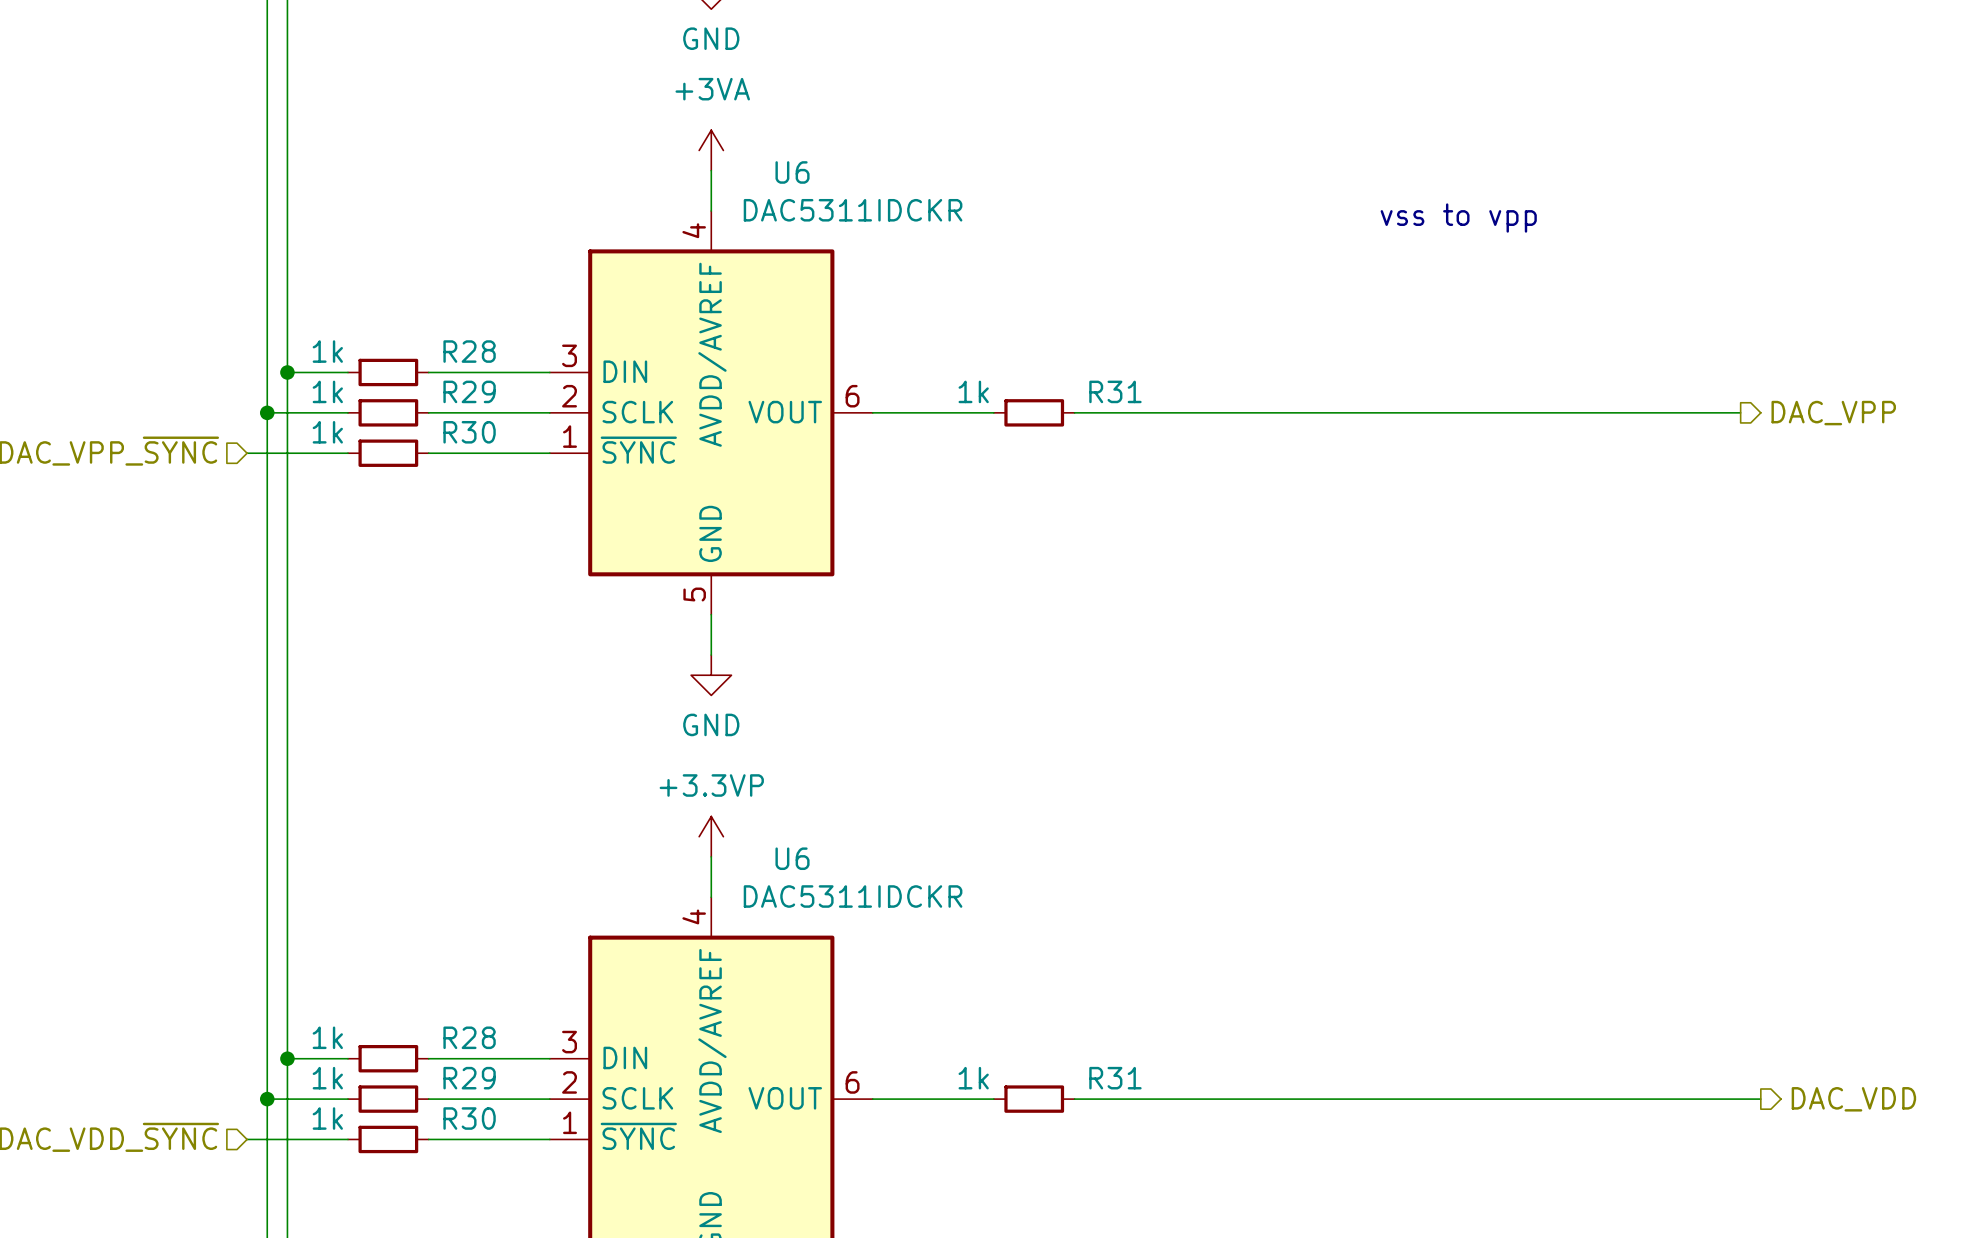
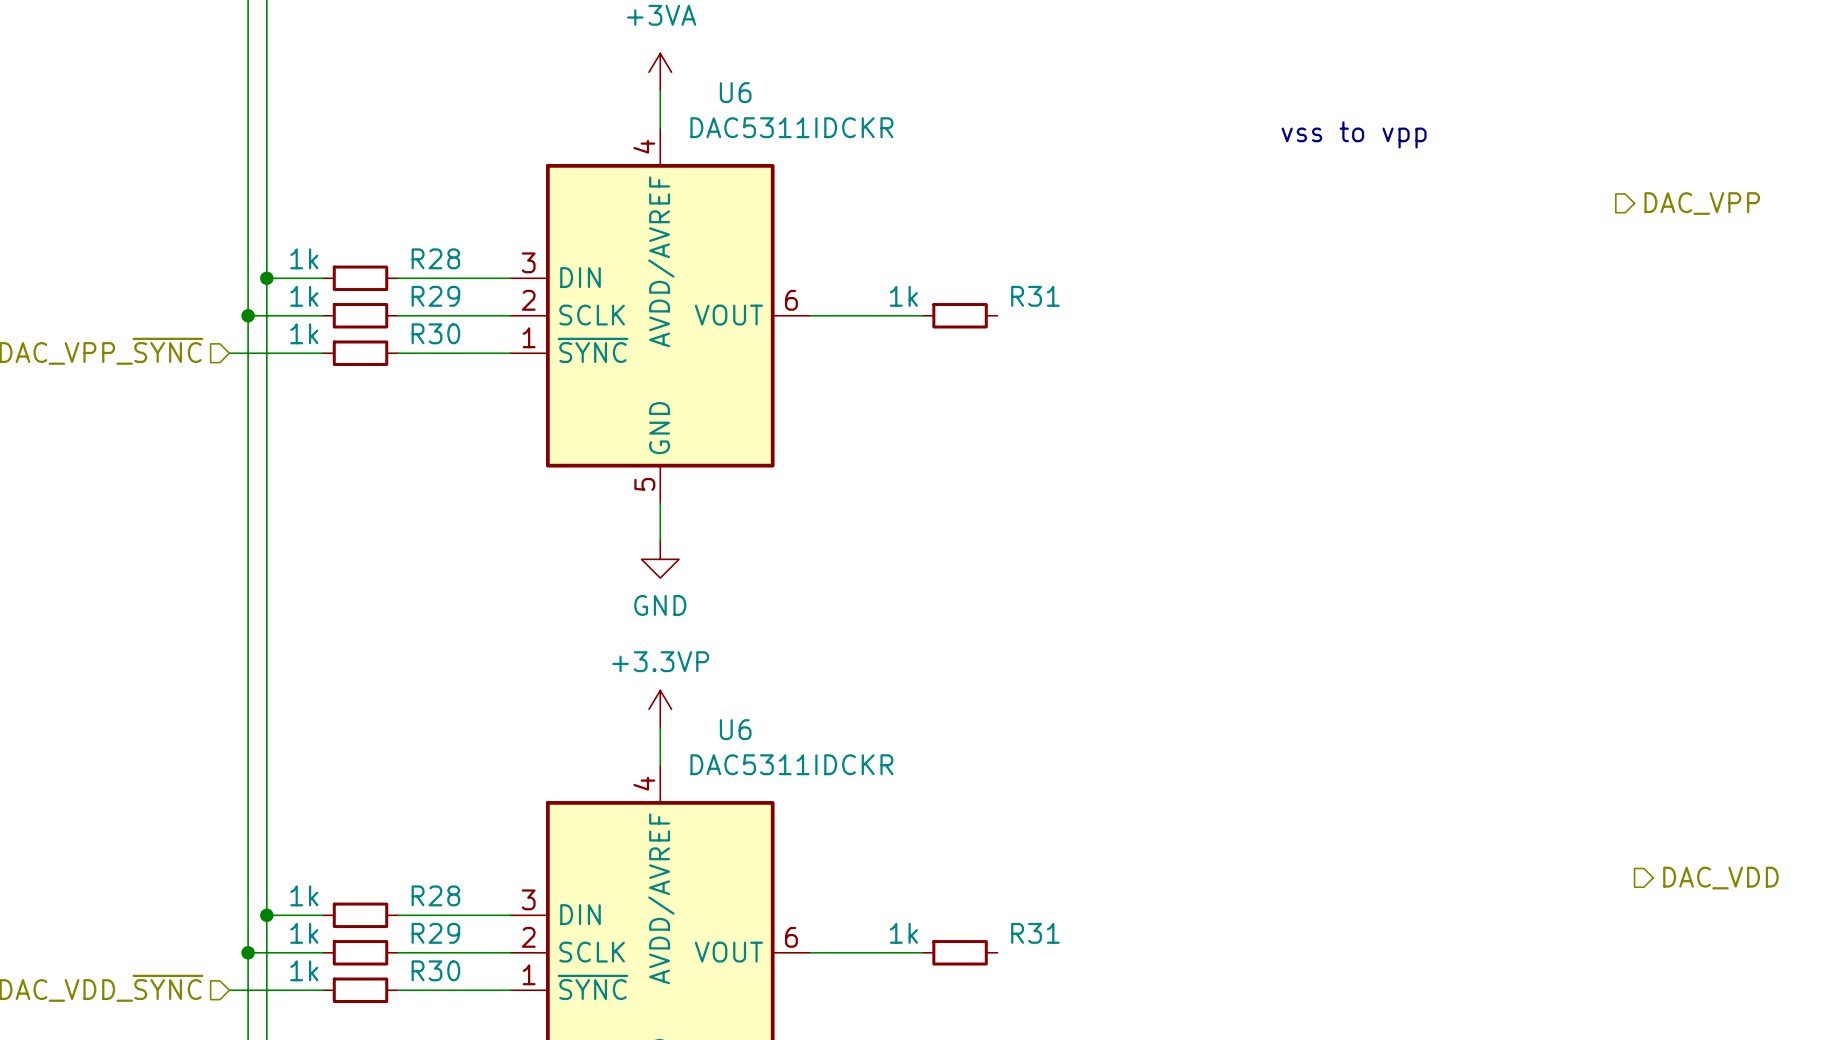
wire: (1074, 412) (1740, 412) -> none
hierarchical label position: DAC_VPP (1833, 413) -> DAC_VPP (1702, 203)
wire: (1074, 1099) (1760, 1099) -> none
hierarchical label position: DAC_VDD (1853, 1099) -> DAC_VDD (1720, 878)

